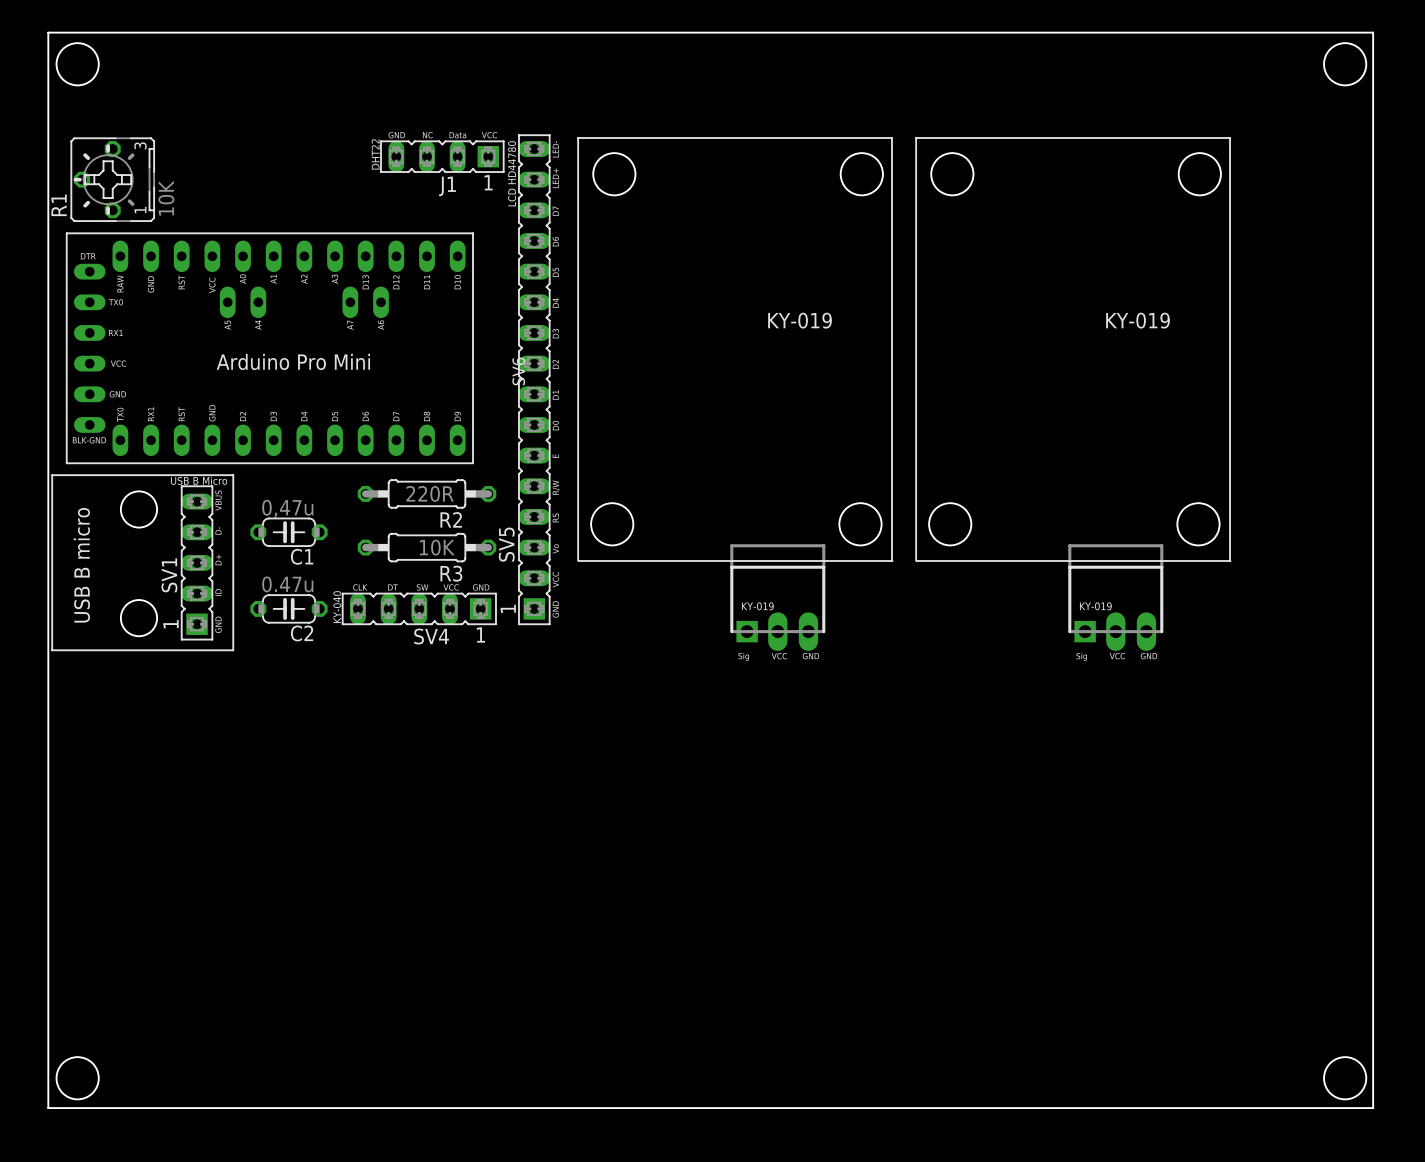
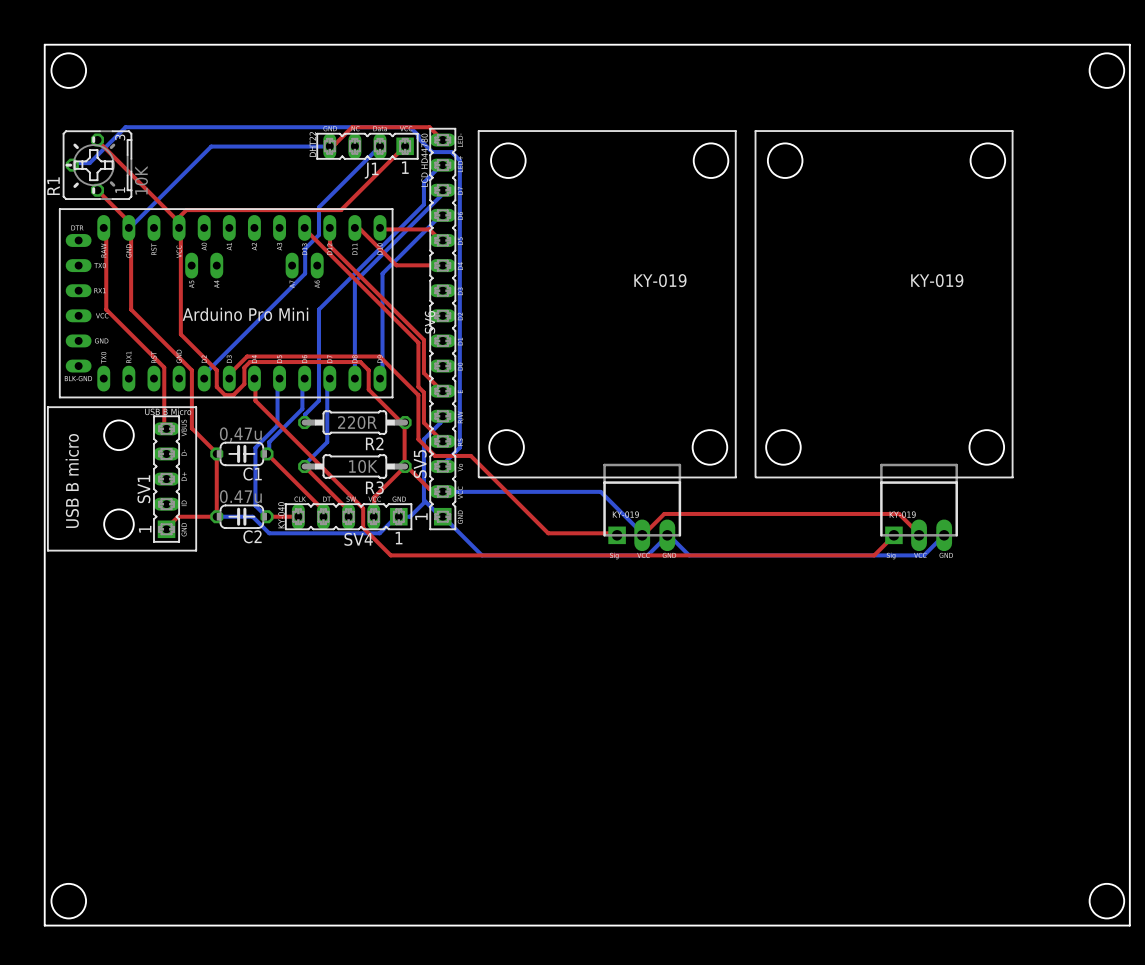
top track: none -> (97, 140) (178, 221) (179, 227)
top track: none -> (442, 140) (429, 127) (352, 127) (335, 143) (330, 143) (329, 146)
bottom track: none -> (329, 146) (211, 146) (128, 227)
bottom track: none -> (380, 146) (318, 207) (318, 234) (305, 248) (305, 273) (205, 373) (204, 378)
top track: none -> (405, 146) (341, 210) (186, 210) (178, 218) (179, 227)
bottom track: none -> (72, 165) (73, 163) (89, 163) (125, 127) (410, 127) (432, 152) (451, 152) (459, 160) (459, 447) (442, 466)
bottom track: none -> (442, 165) (423, 182) (423, 204) (318, 309) (318, 400) (305, 414) (304, 422)
top track: none -> (97, 190) (128, 221) (128, 226) (131, 229) (131, 309) (191, 370) (191, 428) (216, 453) (216, 516) (178, 516) (166, 529)
bottom track: none -> (442, 190) (440, 190) (440, 196) (354, 281) (354, 378)
bottom track: none -> (442, 215) (382, 273) (382, 378) (380, 378)
top track: none -> (103, 227) (106, 229) (106, 309) (164, 367) (164, 428) (166, 428)
top track: none -> (179, 227) (180, 229) (180, 334) (216, 370) (216, 386) (225, 395) (233, 395) (244, 384) (244, 367) (249, 362) (360, 362) (368, 370) (368, 389) (404, 425) (405, 422) (405, 466)
top track: none -> (304, 227) (418, 342) (418, 386) (423, 392) (423, 422) (442, 441)
top track: none -> (329, 227) (330, 246) (423, 339) (423, 373) (442, 391)
top track: none -> (354, 227) (360, 229) (396, 265) (442, 265)
top track: none -> (380, 227) (429, 229) (442, 240)
top track: none -> (229, 378) (230, 373) (247, 356) (379, 356) (418, 395) (418, 439) (435, 455) (470, 455) (548, 533) (614, 533) (617, 535)
top track: none -> (254, 378) (255, 400) (363, 508) (363, 527) (390, 555) (874, 555) (893, 535)
bottom track: none -> (279, 378) (277, 378) (277, 425) (255, 447) (255, 505) (266, 516)
bottom track: none -> (304, 378) (302, 378) (302, 408) (269, 442) (269, 453) (266, 453)
bottom track: none -> (329, 378) (327, 378) (327, 442) (304, 466)
bottom track: none -> (442, 416) (440, 417) (440, 422) (423, 439) (423, 500) (481, 555) (647, 555) (667, 535) (689, 555) (923, 555) (944, 535)
top track: none -> (266, 453) (321, 508) (321, 516) (323, 516)
top track: none -> (304, 466) (346, 508) (346, 516) (348, 516)
top track: none -> (405, 466) (374, 497) (373, 516)
top track: none -> (405, 466) (429, 489) (440, 489) (442, 491)
bottom track: none -> (442, 491) (600, 491) (642, 535)
bottom track: none -> (425, 501) (410, 516) (396, 516) (379, 533) (269, 533) (252, 516) (216, 516)
top track: none -> (266, 516) (298, 516)
top track: none -> (642, 535) (664, 513) (899, 513) (919, 535)

